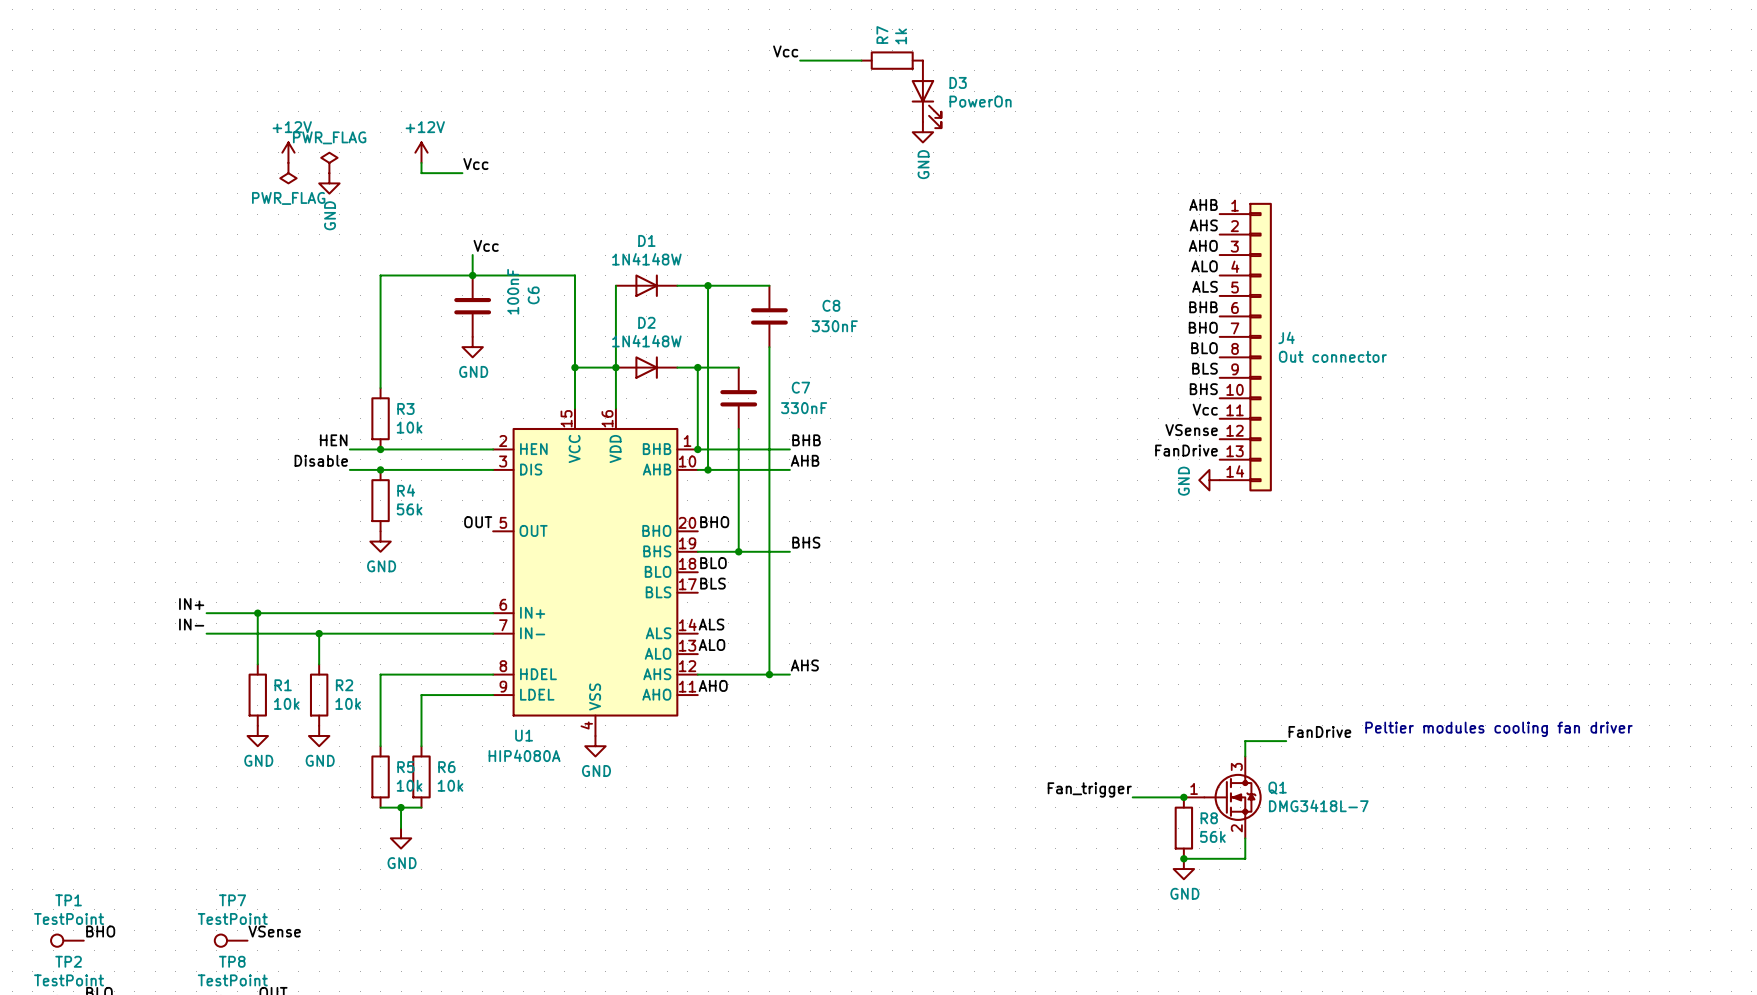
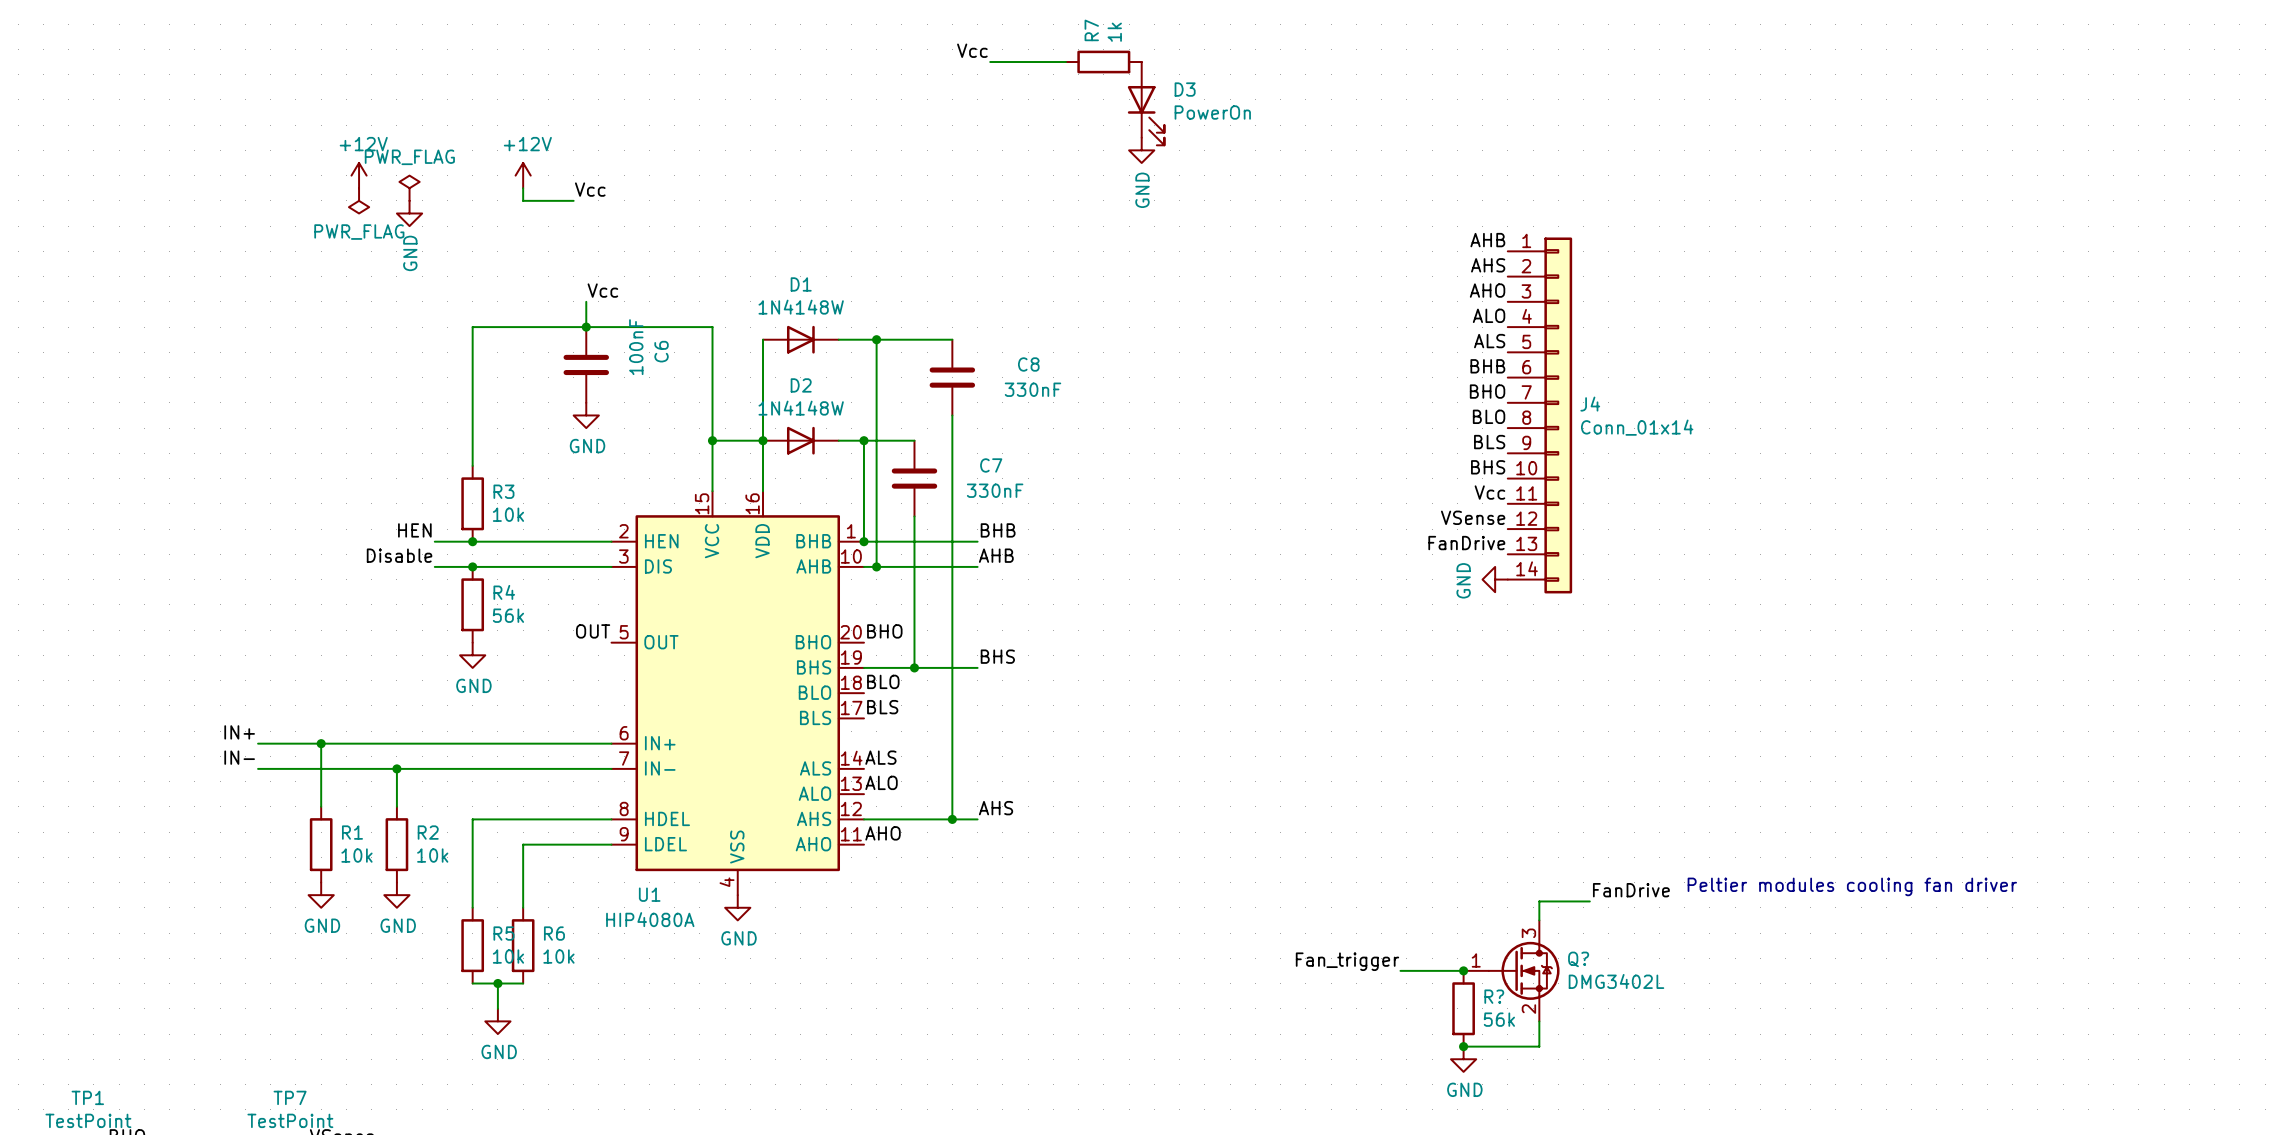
J4 value: Out connector (1332, 356) -> Conn_01x14 (1637, 427)
Q1 name: Q1 (1277, 788) -> Q? (1578, 959)
Q1 value: DMG3418L-7 (1318, 805) -> DMG3402L (1616, 981)
R8 name: R8 (1209, 818) -> R? (1494, 996)

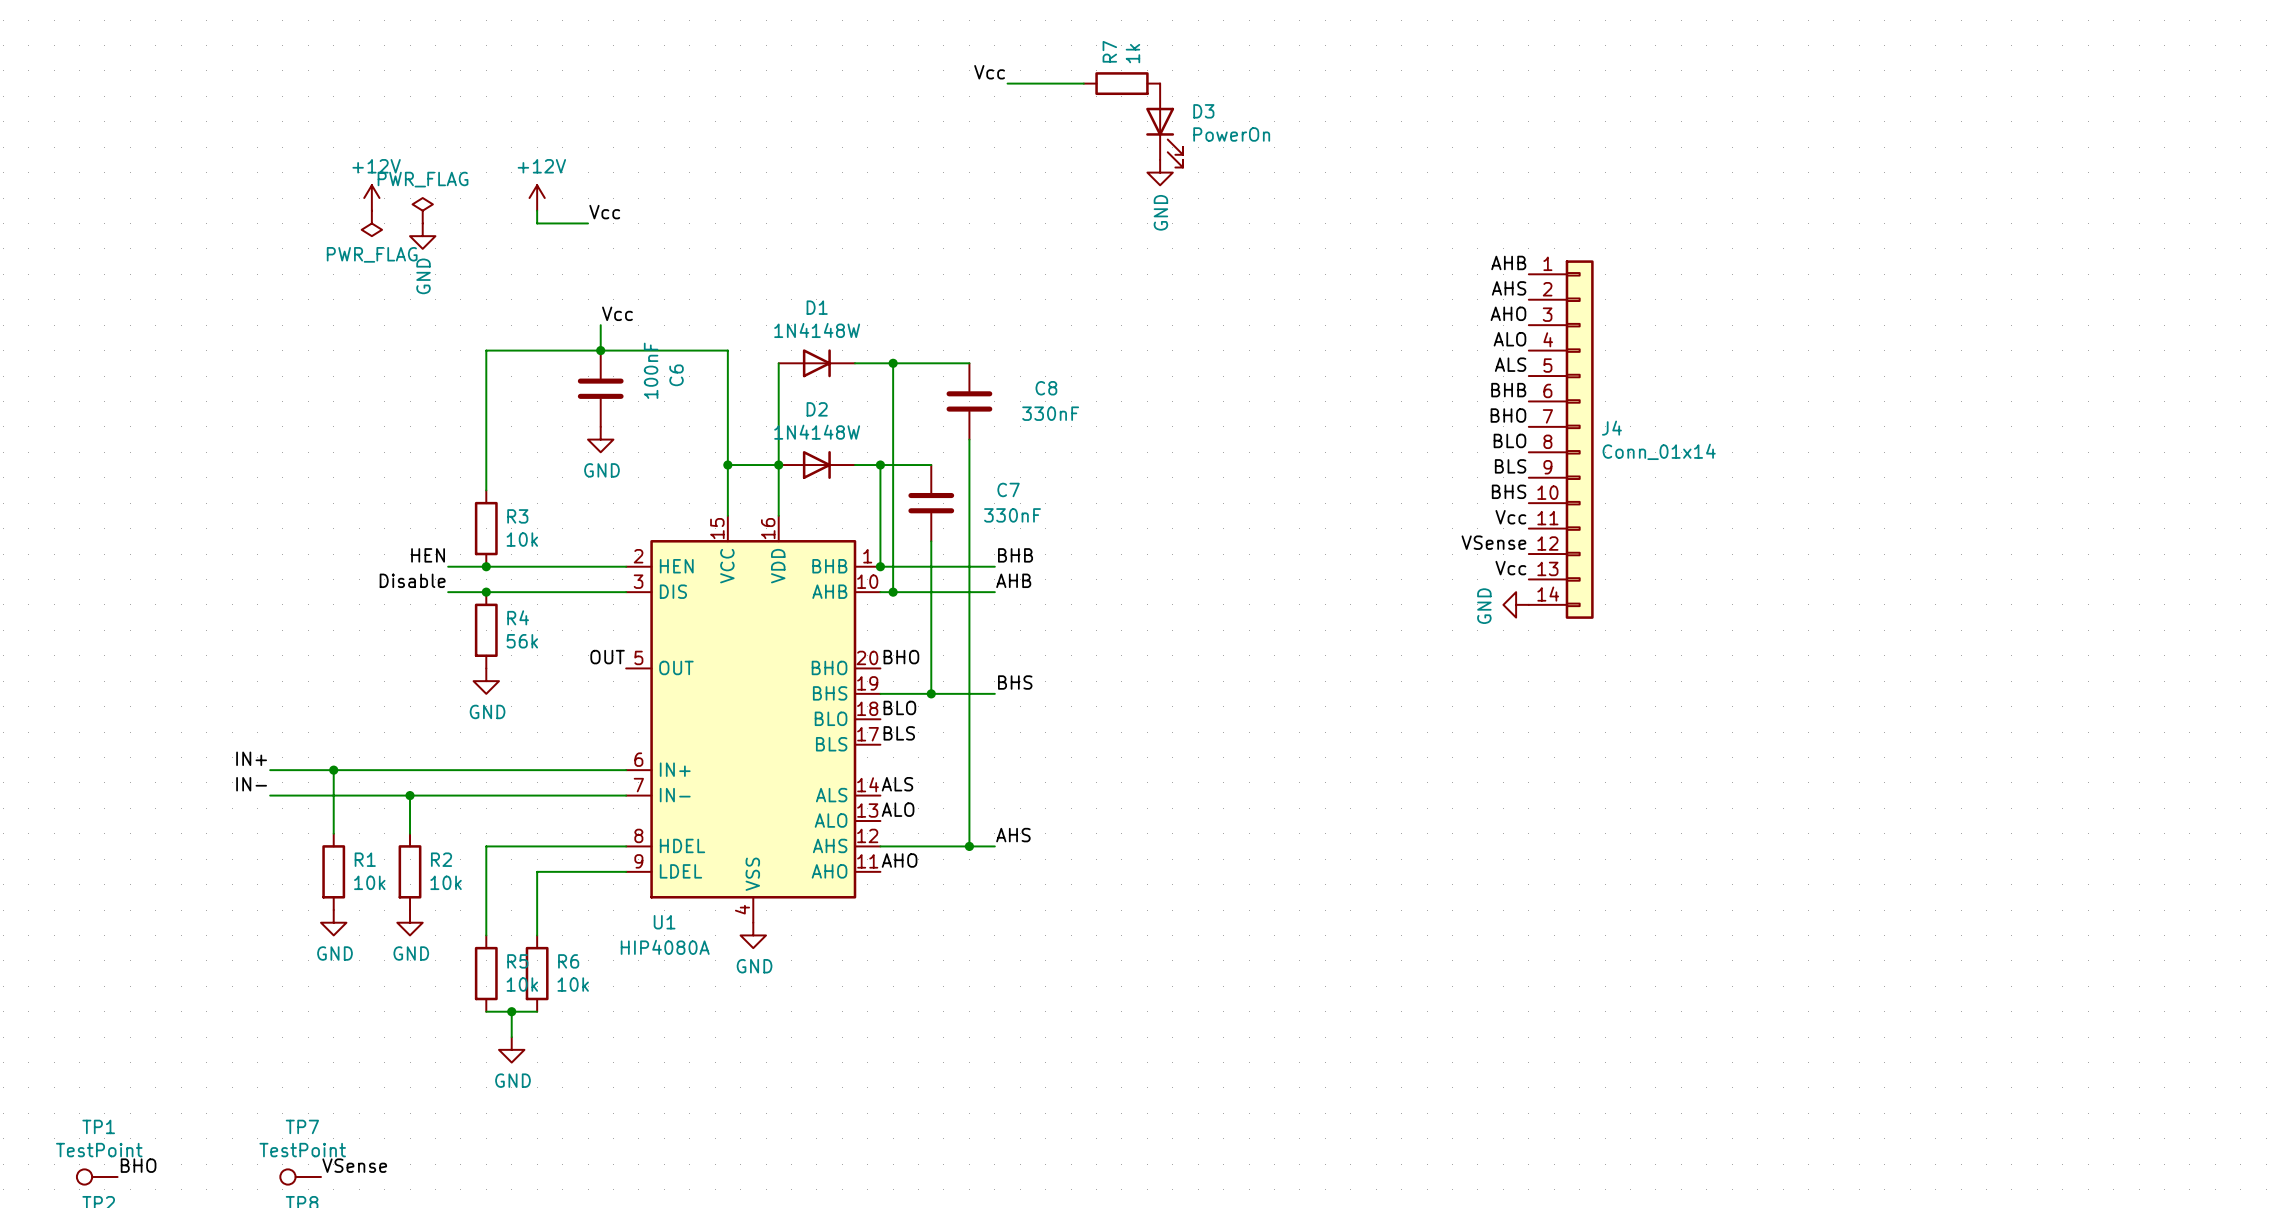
label: FanDrive (1466, 543) -> Vcc (1510, 568)
text: Peltier modules cooling fan driver (1852, 886) -> none
label: FanDrive (1631, 890) -> none
wire: (1589, 901) (1539, 901) (1539, 920) -> none
label: Fan_trigger (1347, 961) -> none
wire: (1400, 970) (1463, 970) -> none
junction: (1463, 970) -> none
Q?: DMG3402L (1511, 970) -> none
R?: 56k (1463, 1008) -> none
wire: (1539, 1021) (1539, 1046) (1463, 1046) -> none
junction: (1463, 1046) -> none
power symbol: GND (1463, 1059) -> none

